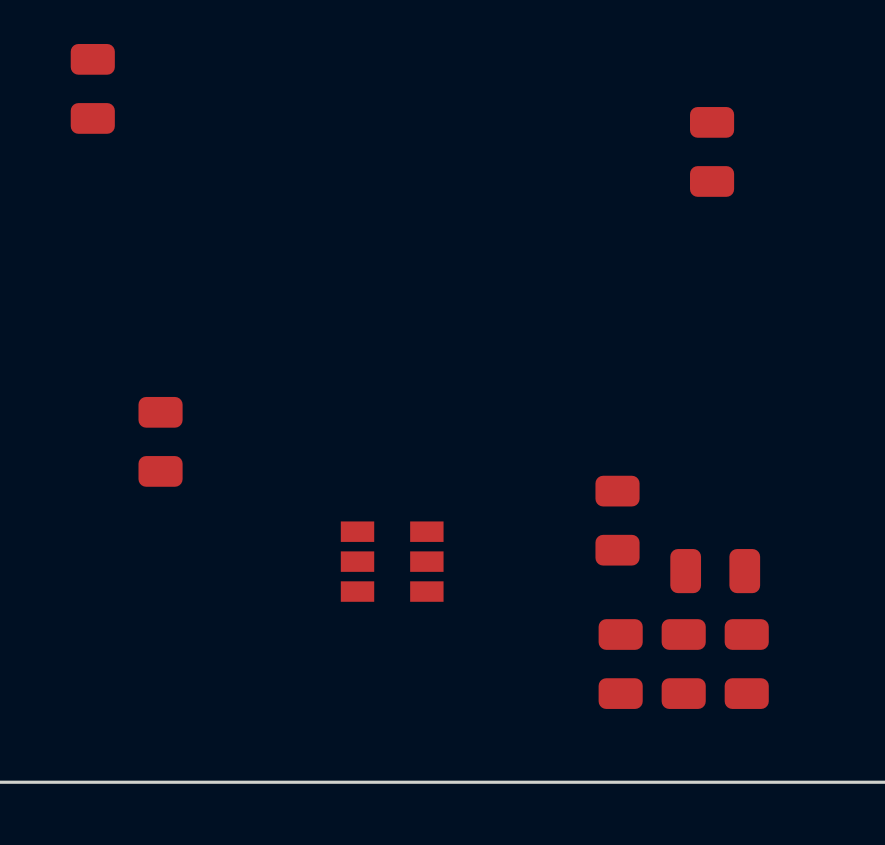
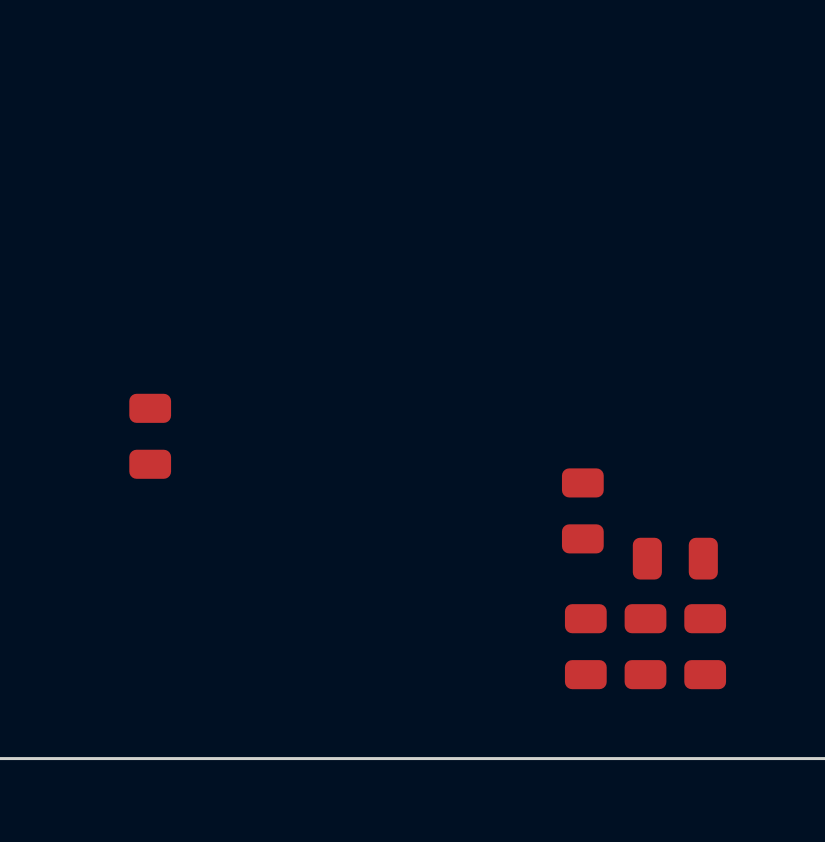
part: (92, 88) -> none
part: (712, 151) -> none
part: (392, 561) -> none

